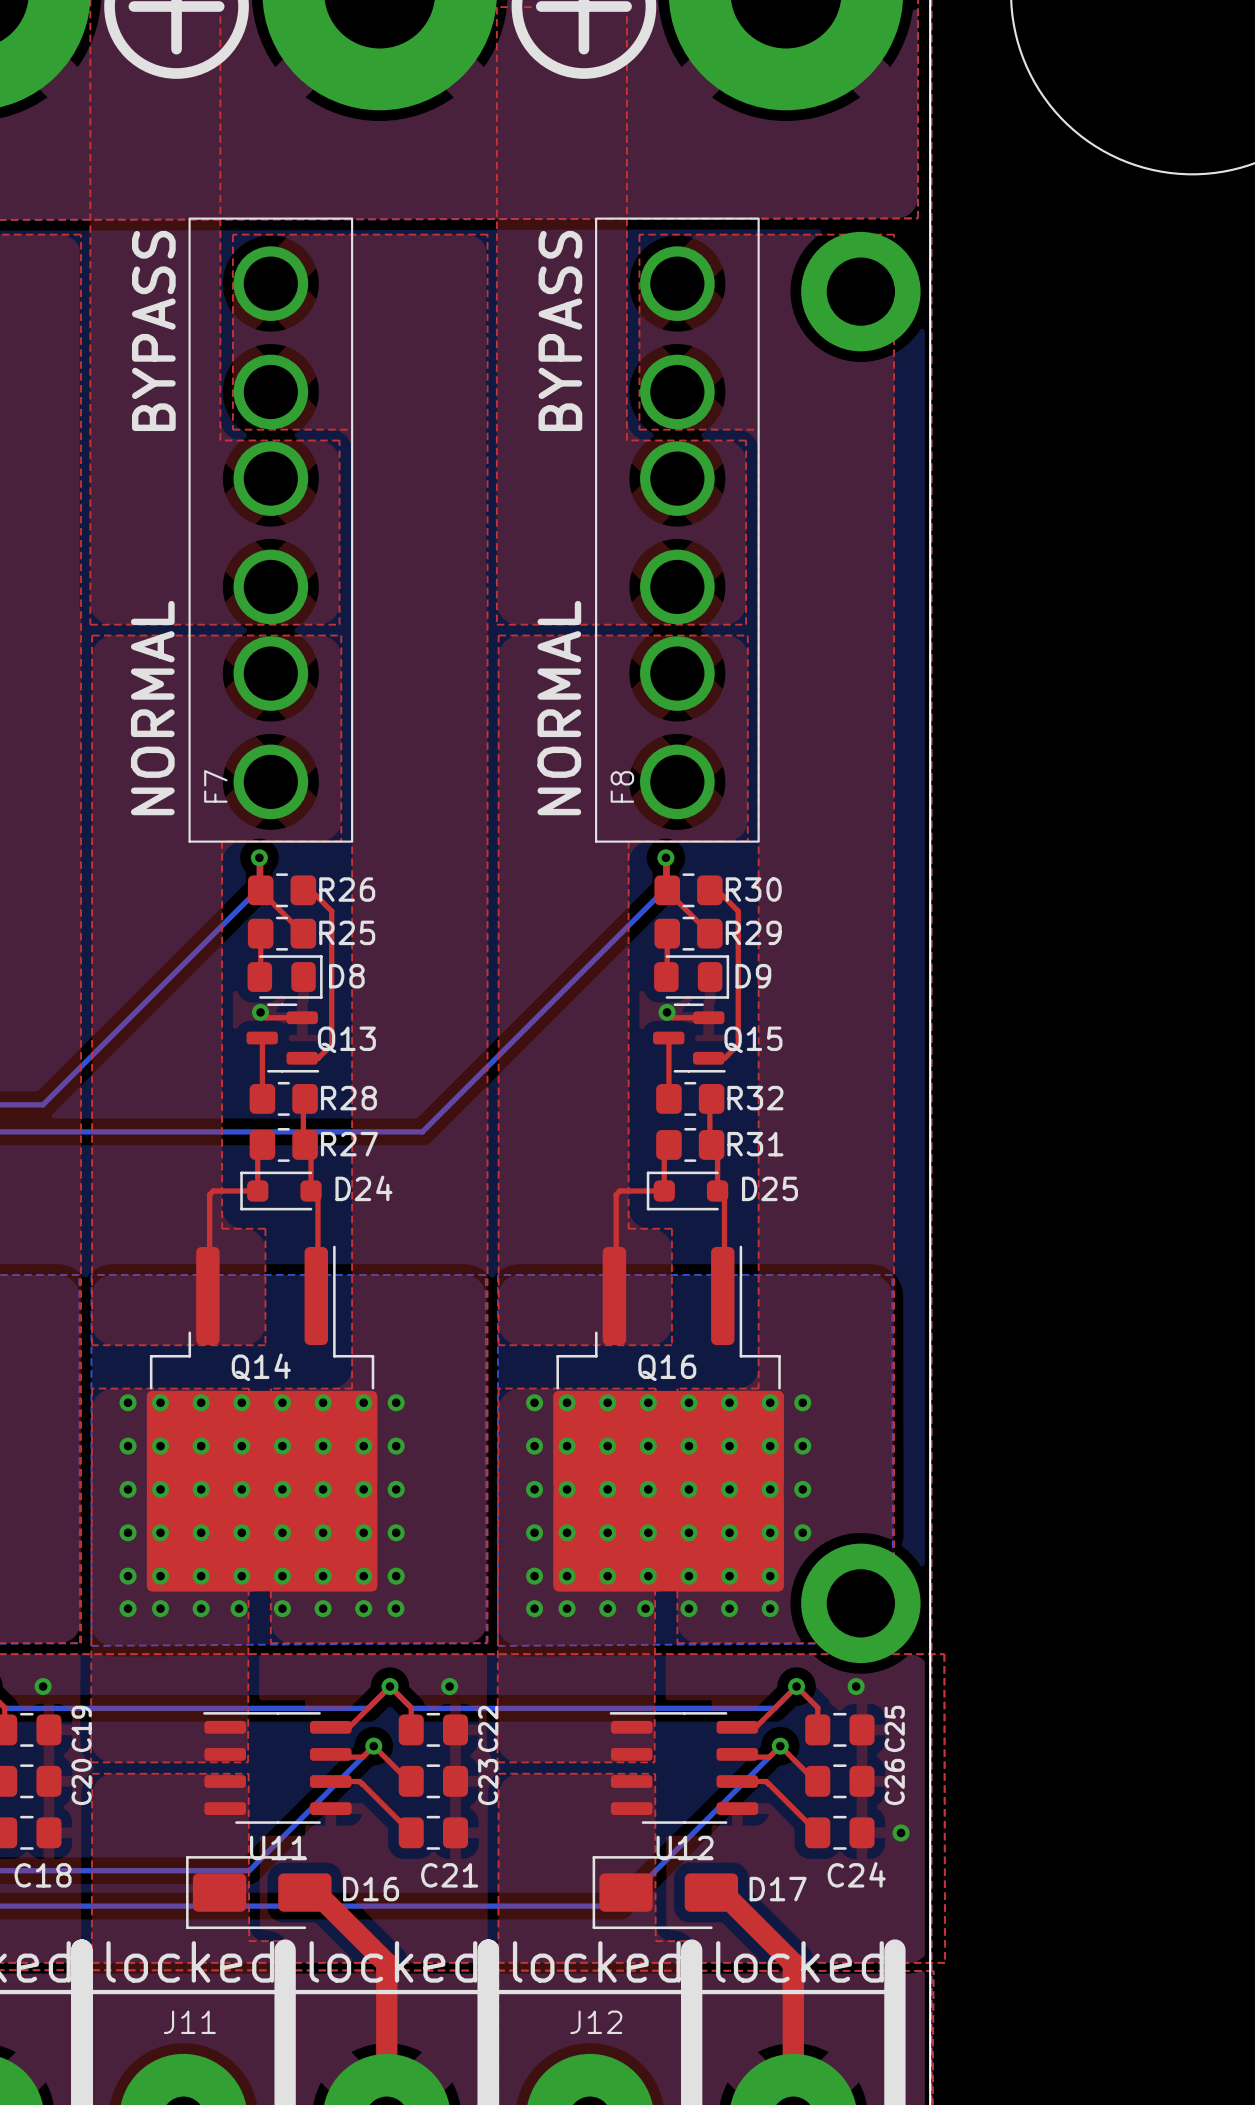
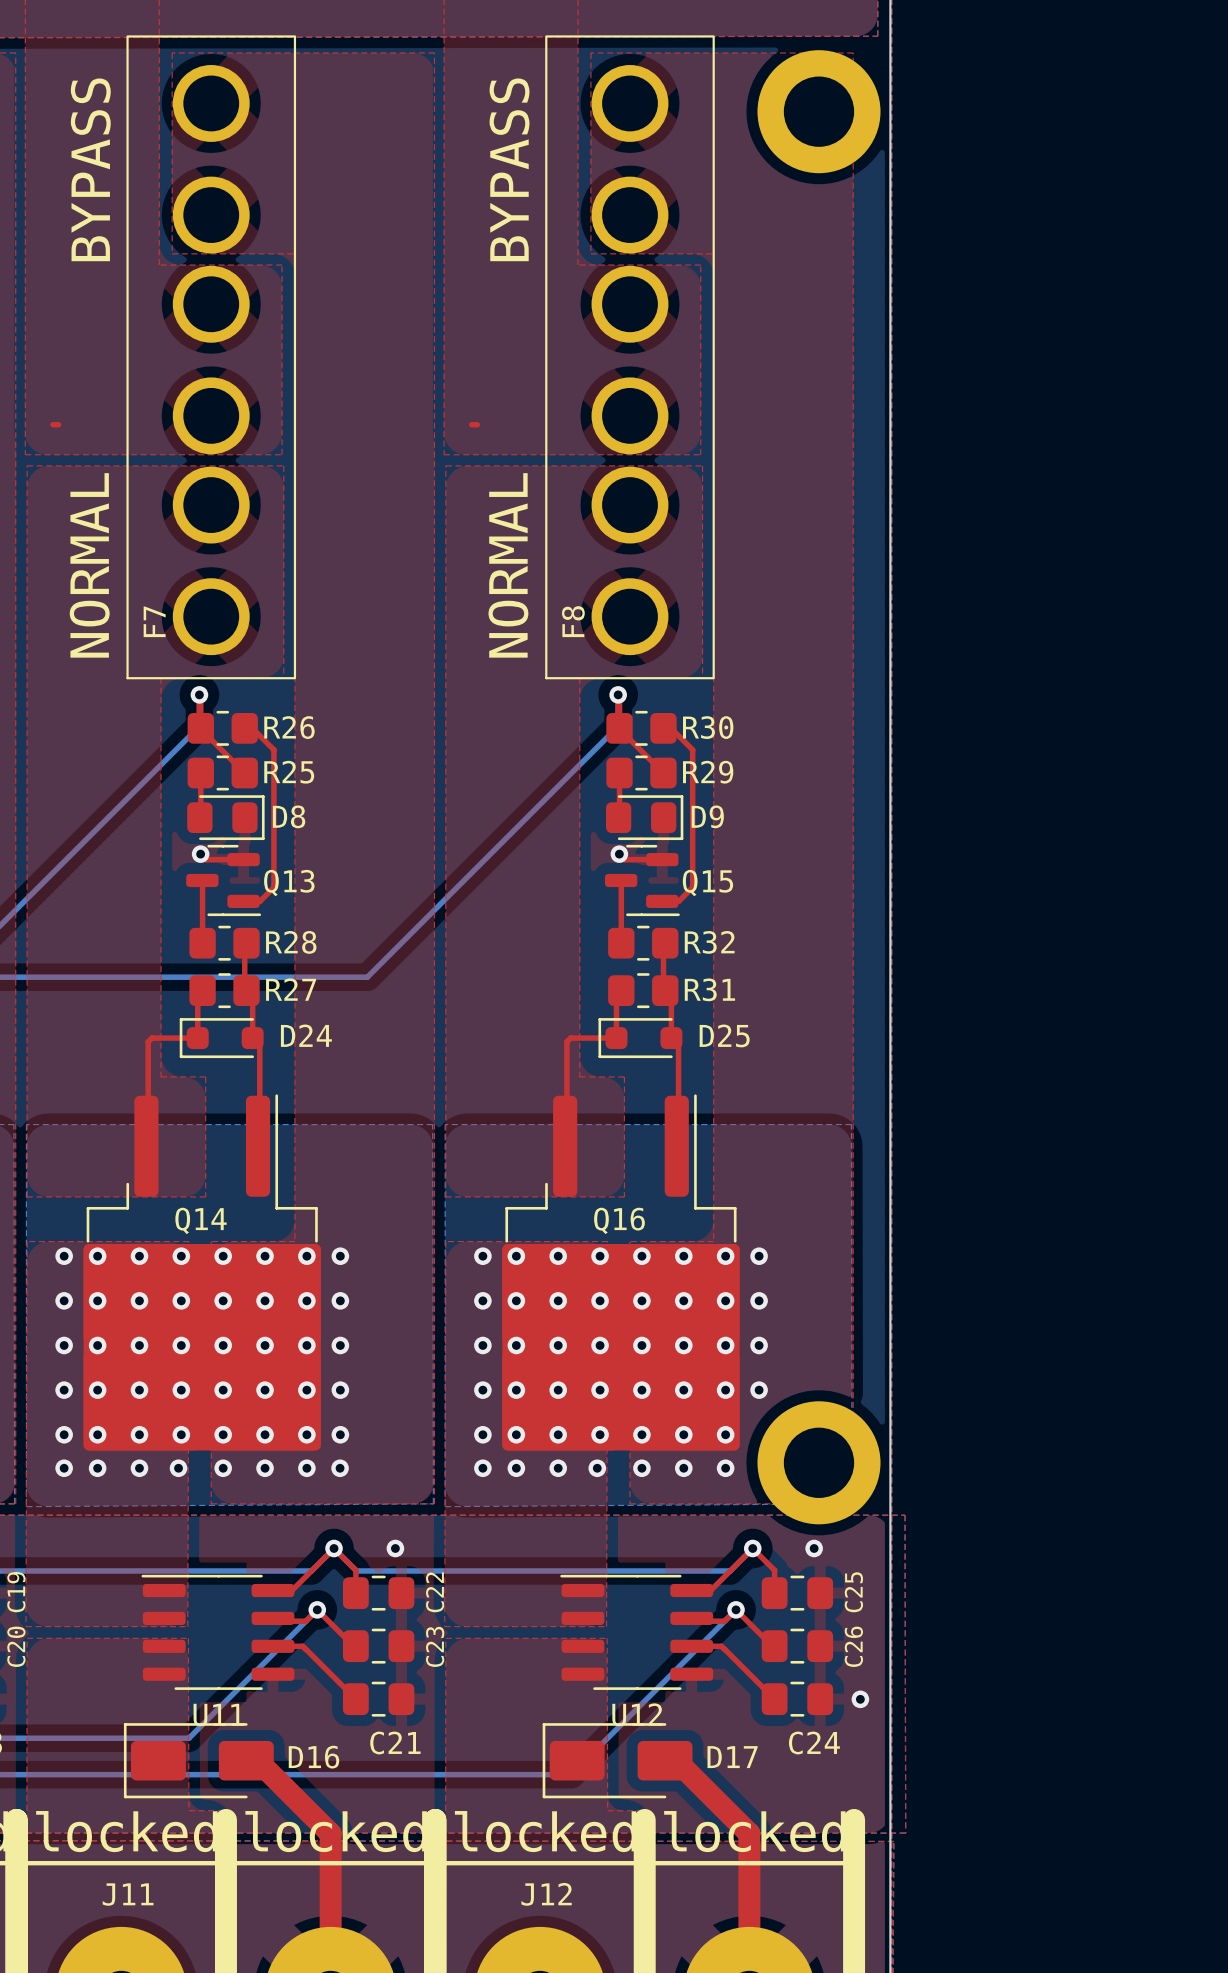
top track: none -> (52, 424) (58, 424)
top track: none -> (471, 424) (477, 424)

